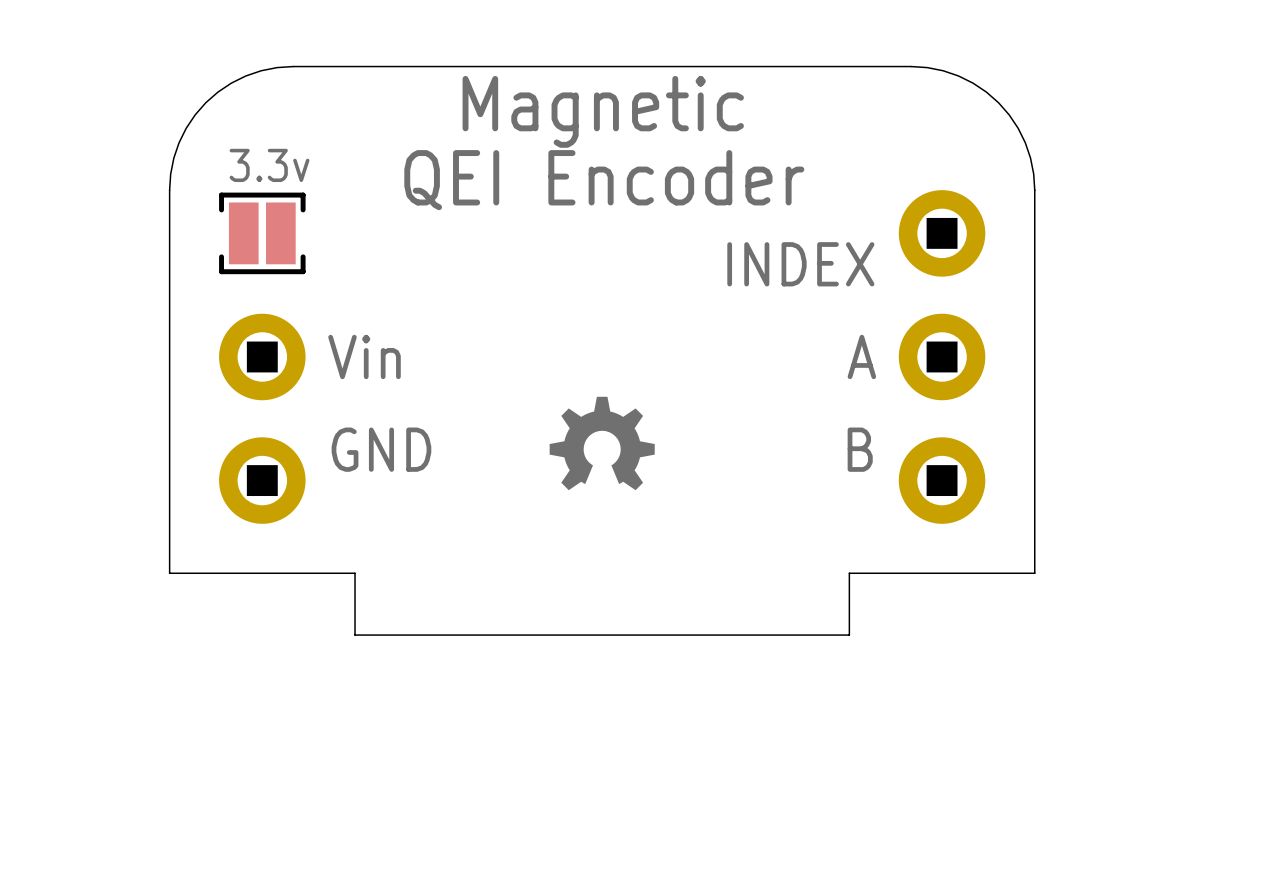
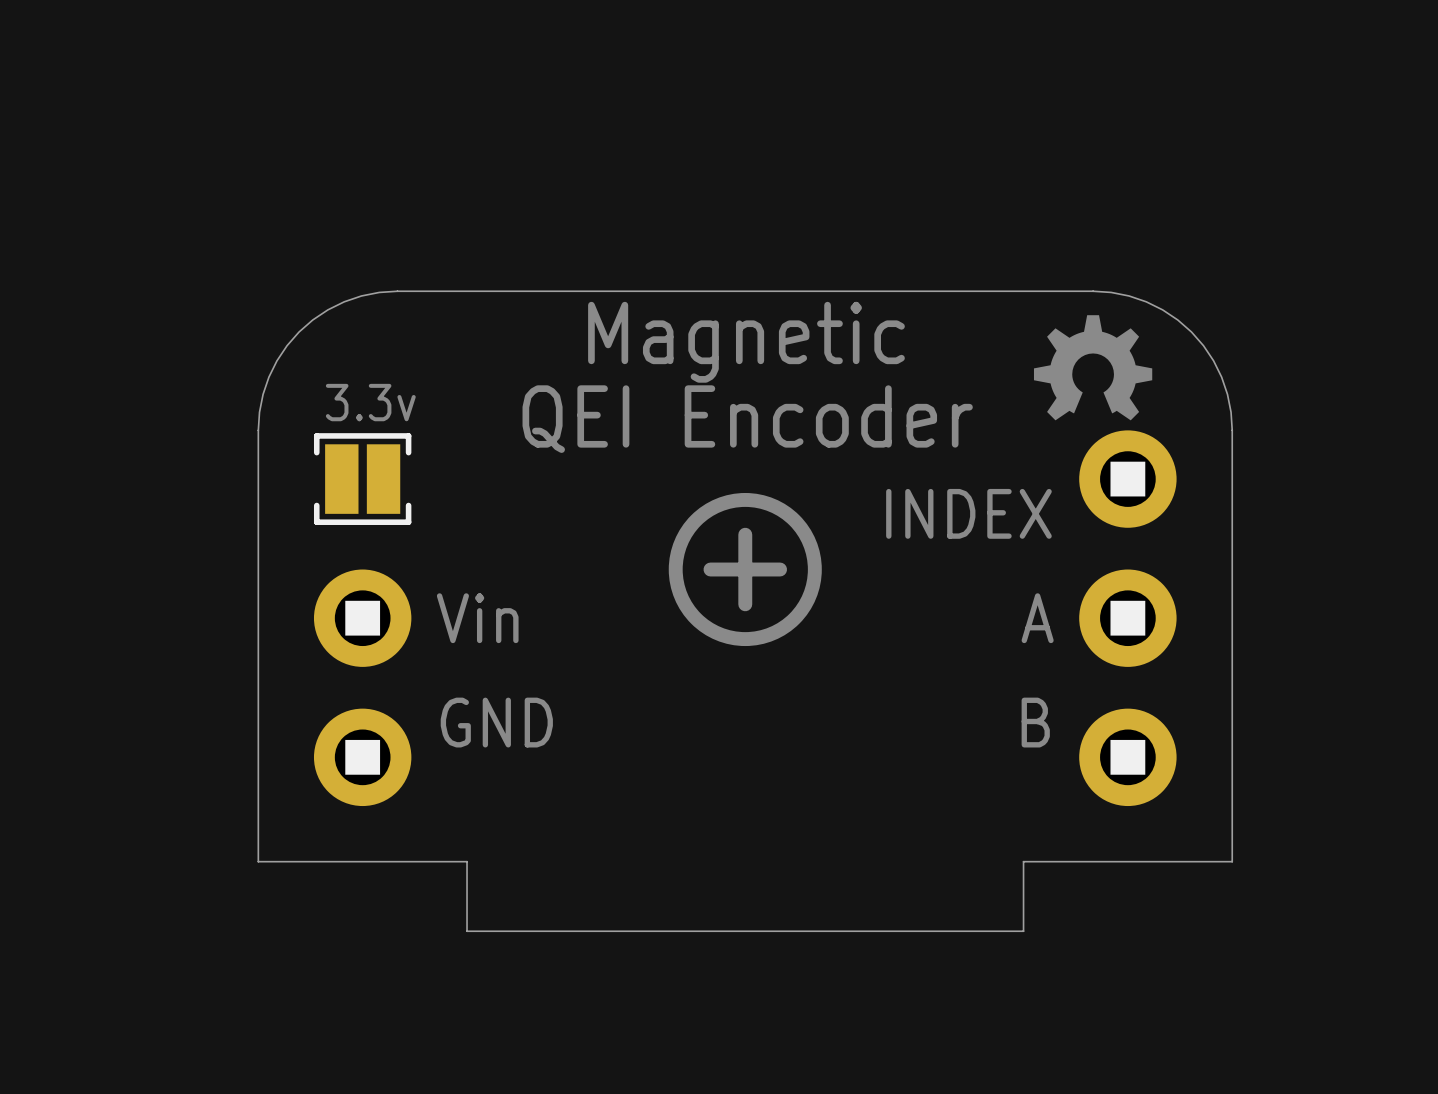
drawing: none -> [668, 492, 822, 647]
line: none -> (745, 534) (745, 604)
line: none -> (710, 569) (780, 569)
drawing position: (602, 443) -> (1093, 367)

